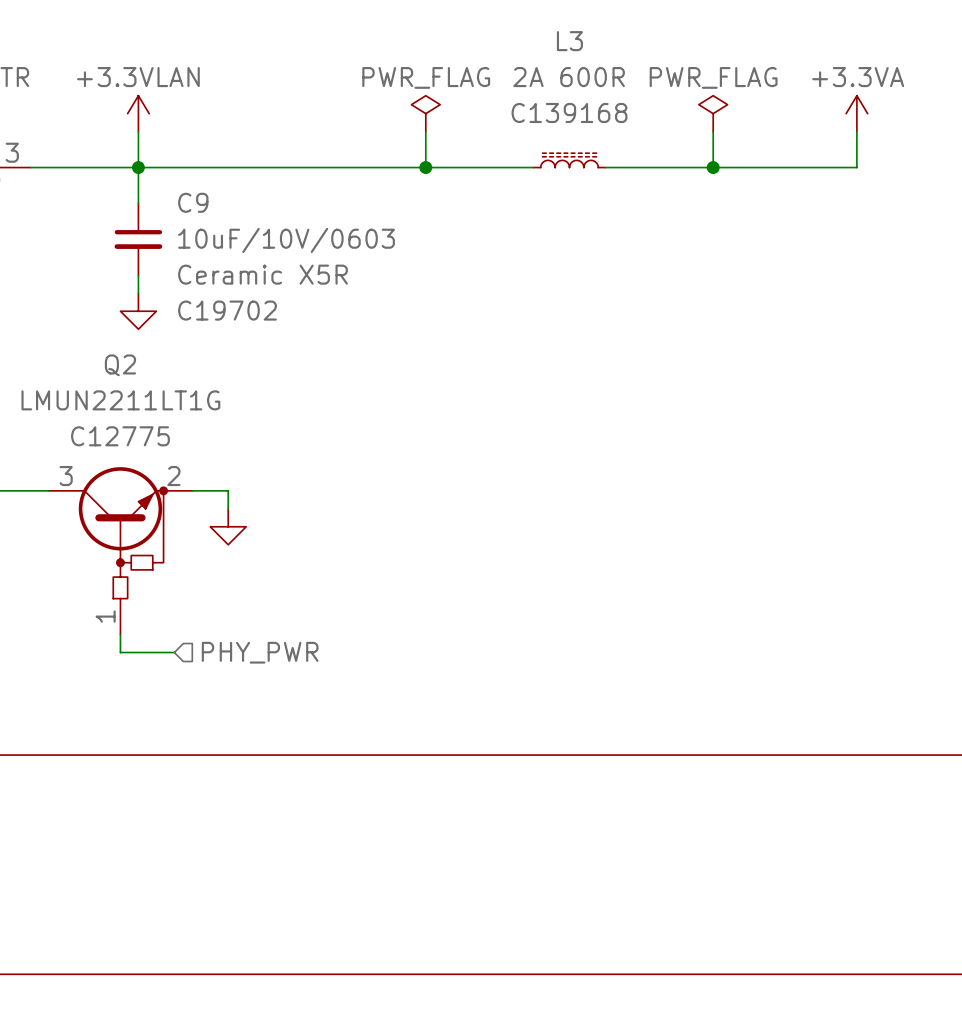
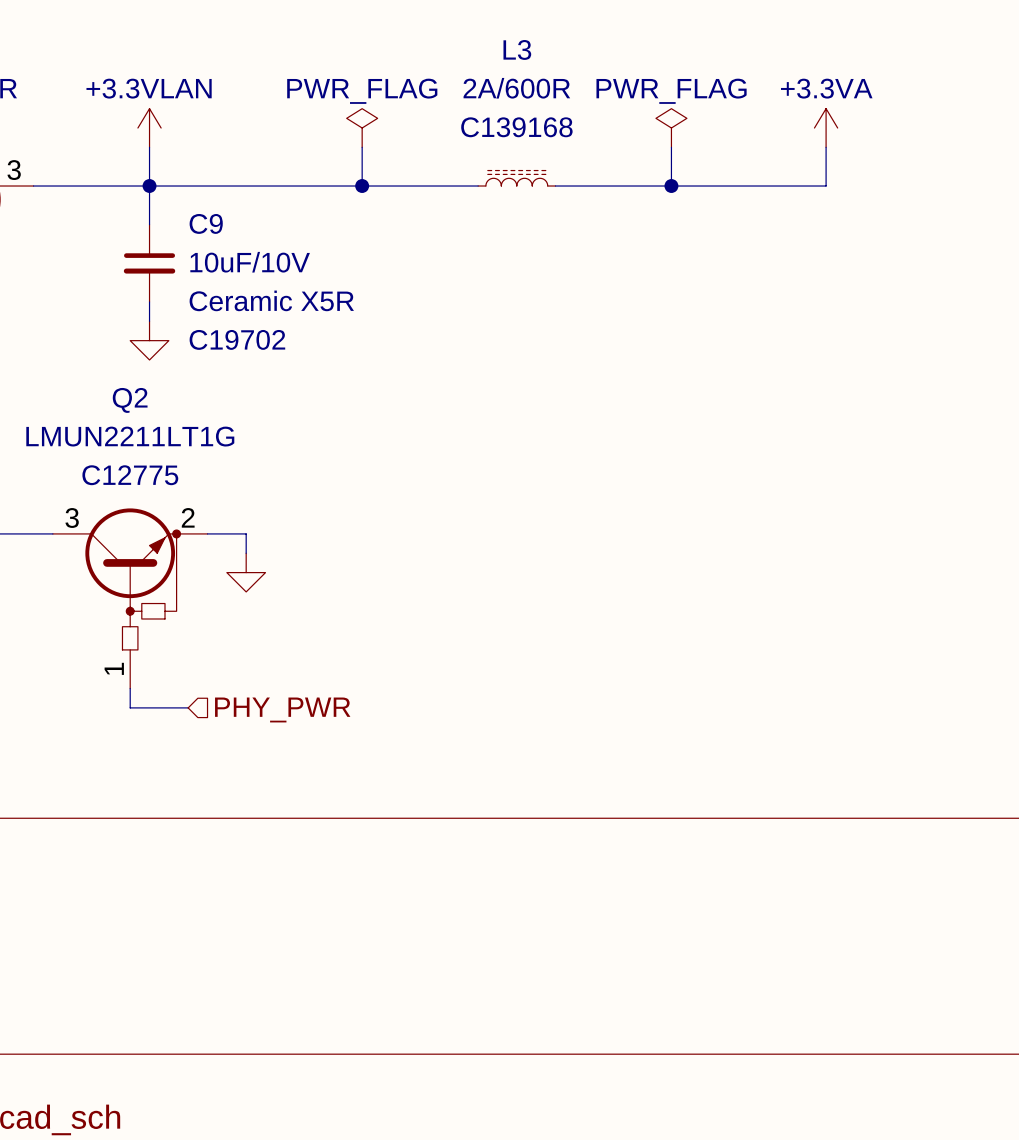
L3 value: 2A 600R (569, 77) -> 2A/600R (516, 88)
power symbol position: PWR_FLAG (425, 113) -> PWR_FLAG (362, 128)
power symbol position: PWR_FLAG (713, 113) -> PWR_FLAG (671, 128)
power symbol position: +3.3VA (856, 113) -> +3.3VA (826, 128)
wire: (425, 131) (425, 167) -> (362, 147) (362, 186)
wire: (713, 131) (713, 167) -> (671, 147) (671, 186)
wire: (856, 131) (856, 167) (767, 167) -> (826, 147) (826, 186)
L3 position: (569, 160) -> (516, 178)
junction: none -> (362, 186)
junction: (425, 167) -> none
wire: (443, 167) (515, 167) -> (574, 186) (652, 186)
junction: none -> (671, 186)
junction: (713, 167) -> none
C9 value: 10uF/10V/0603 (286, 240) -> 10uF/10V (250, 262)

